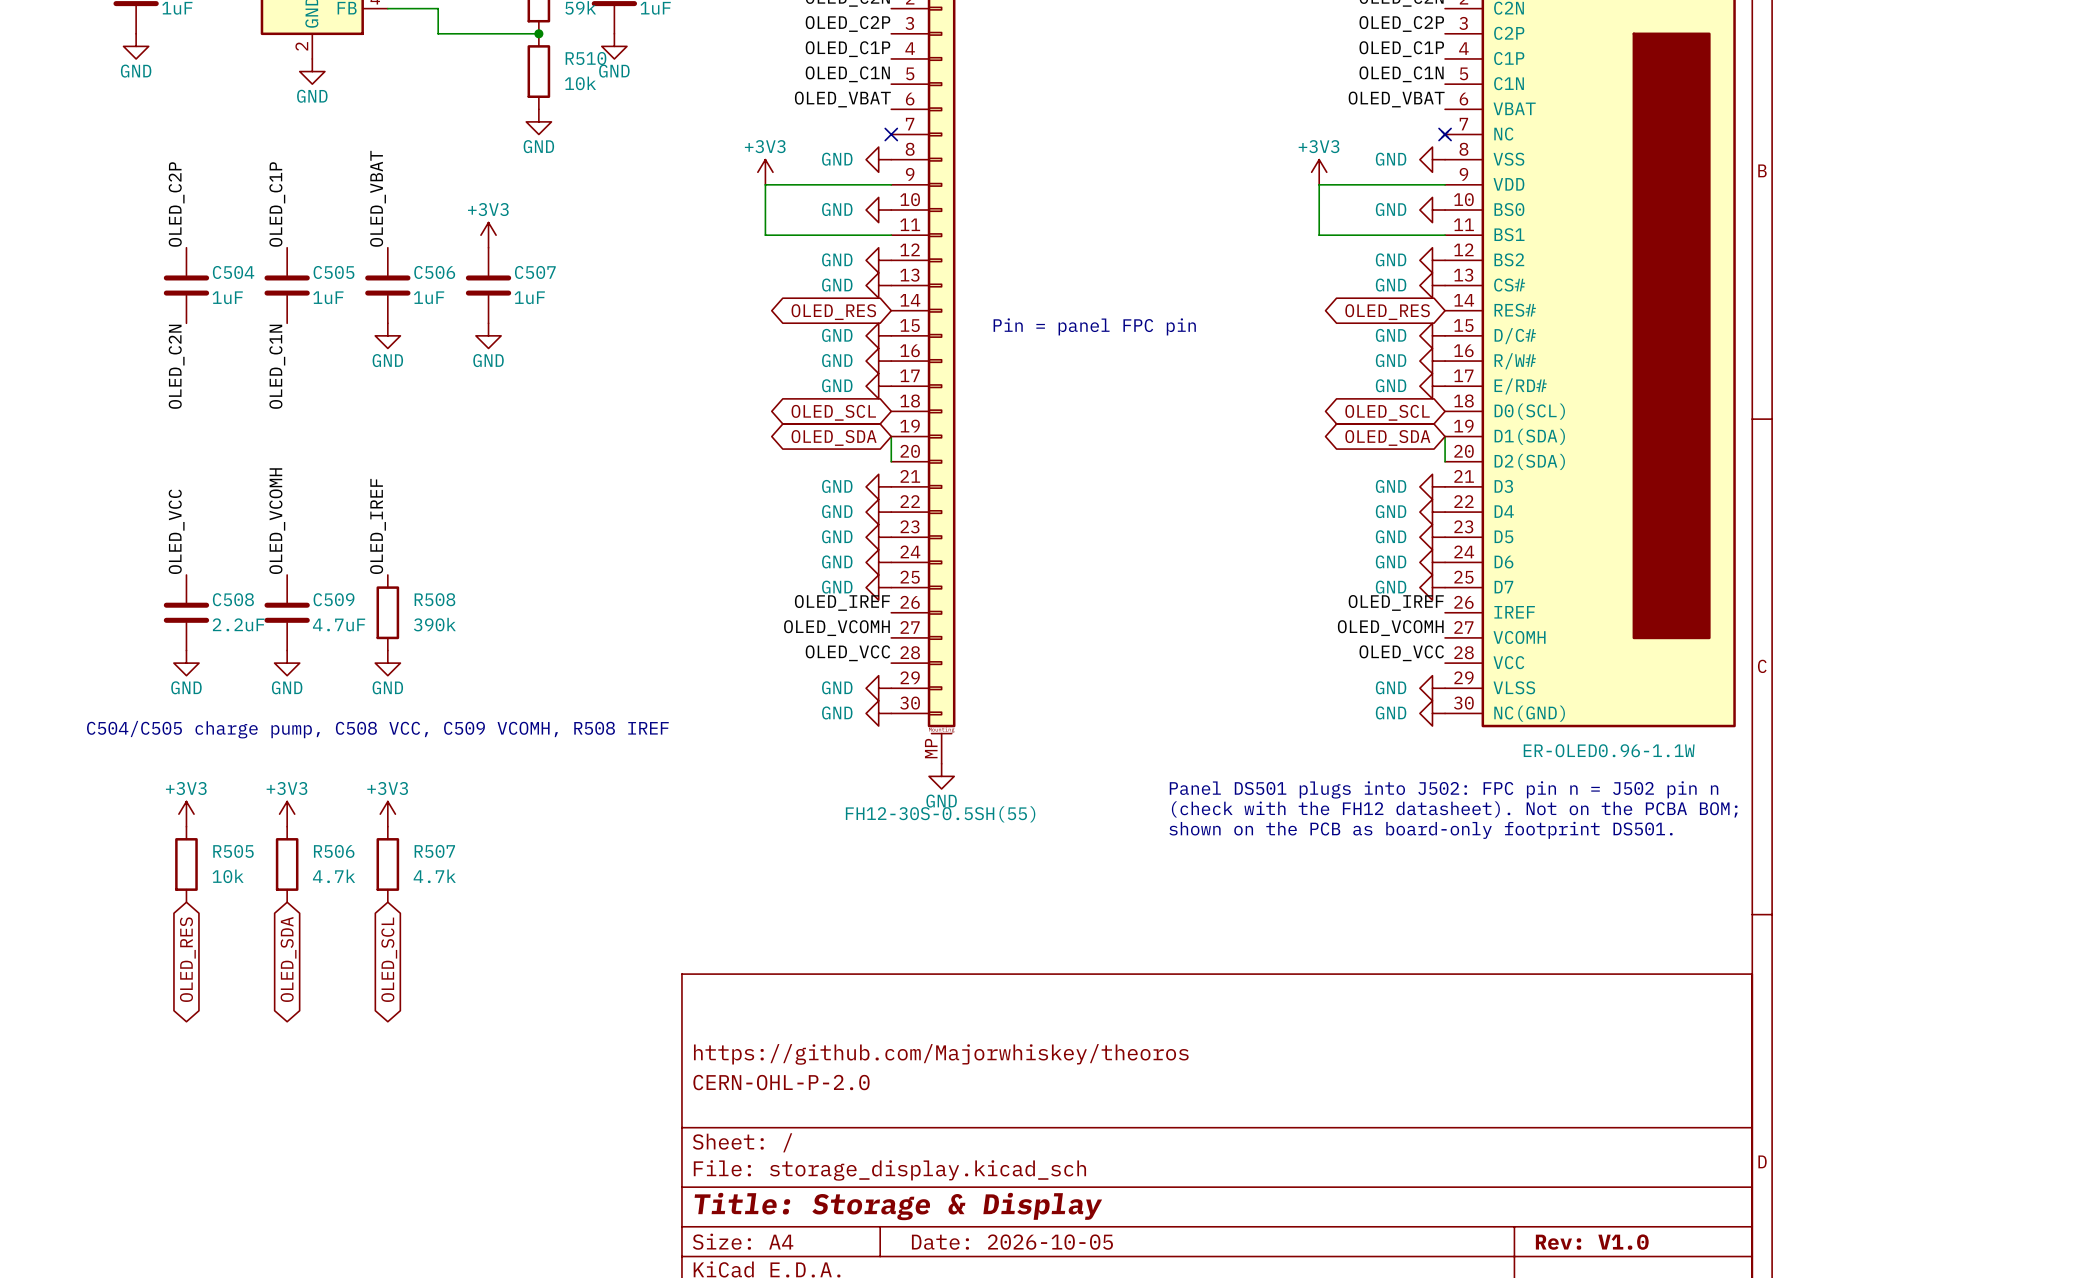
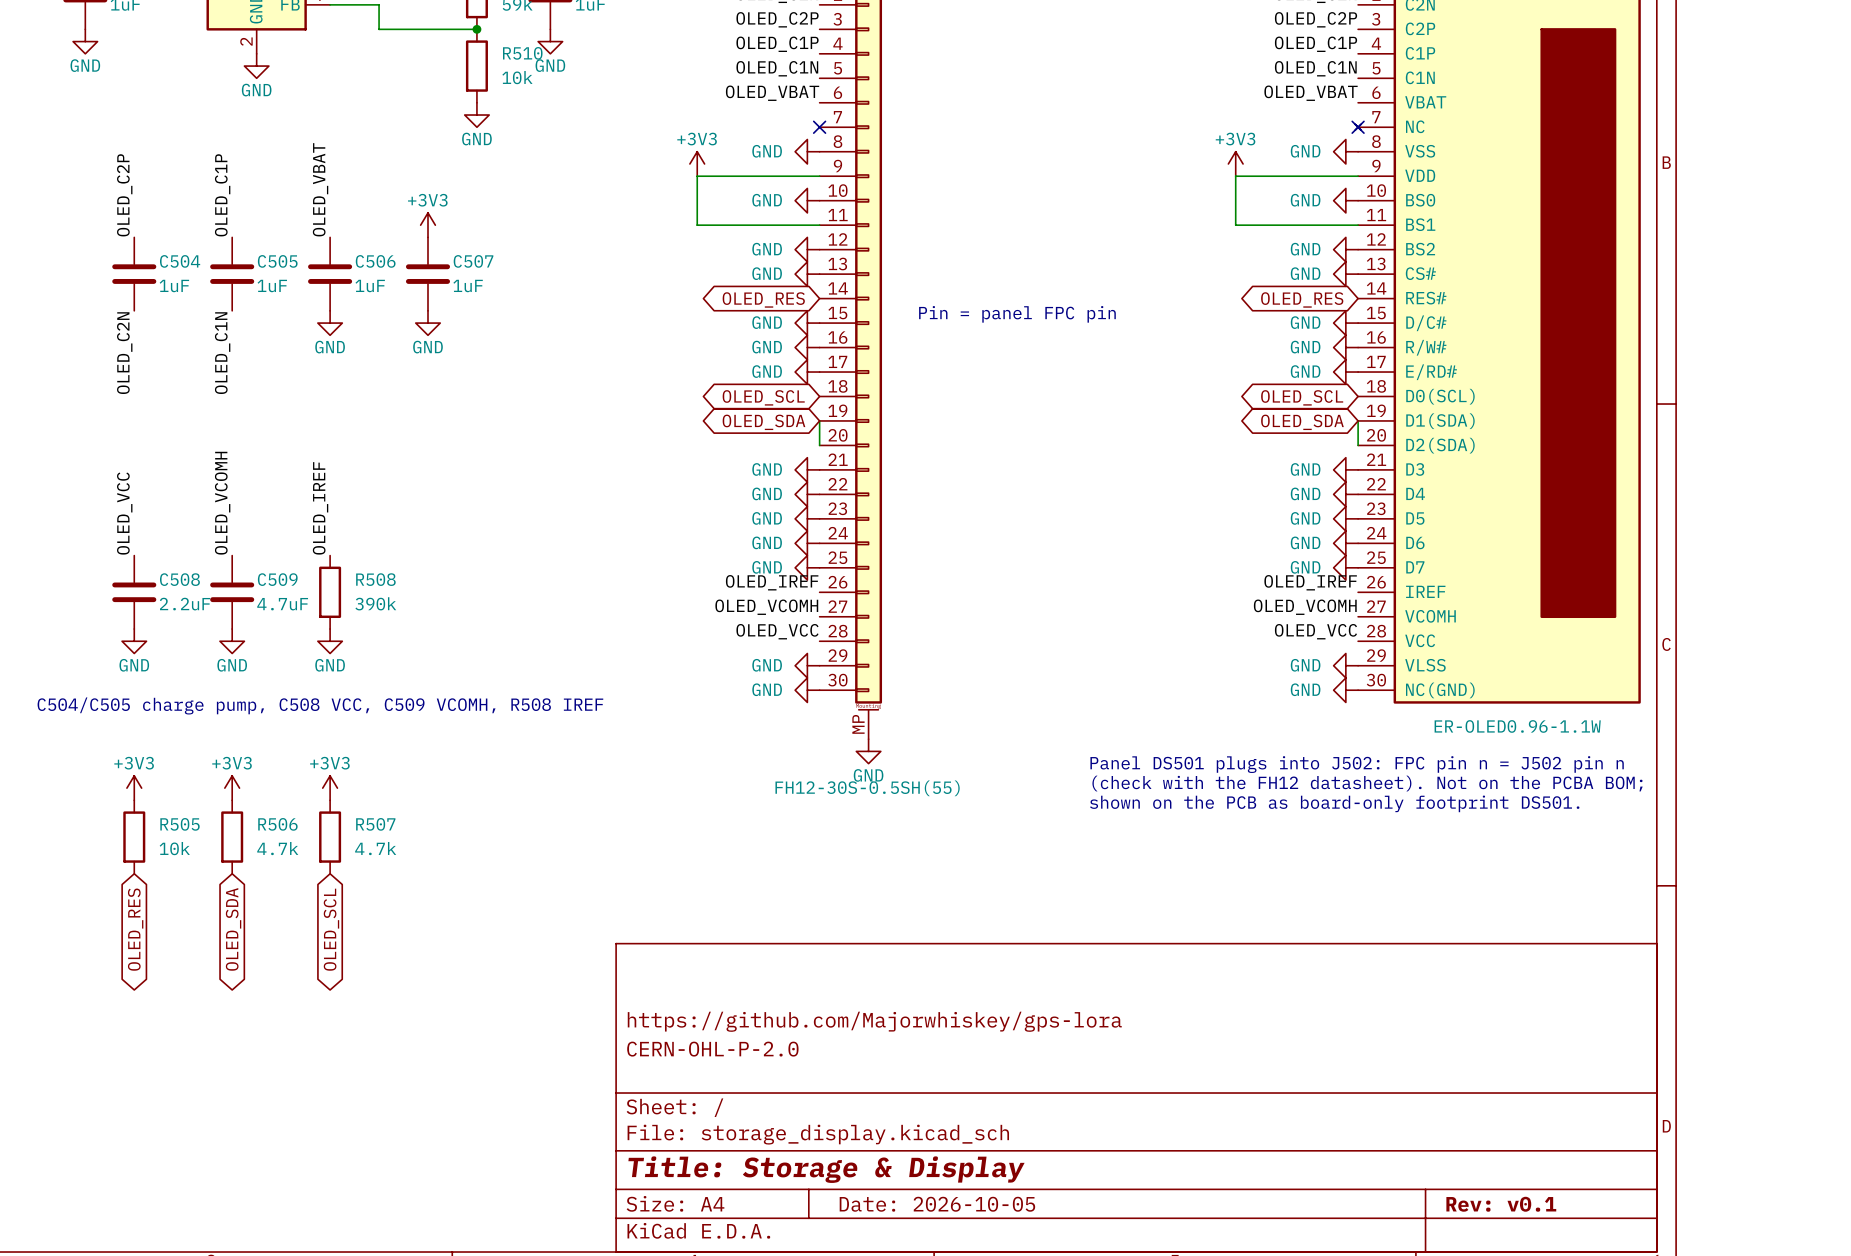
title block: https://github.com/Majorwhiskey/theoros (941, 1054) -> https://github.com/Majorwhiskey/gps-lora (874, 1021)
title block: Rev: V1.0 (1592, 1242) -> Rev: v0.1 (1501, 1204)

